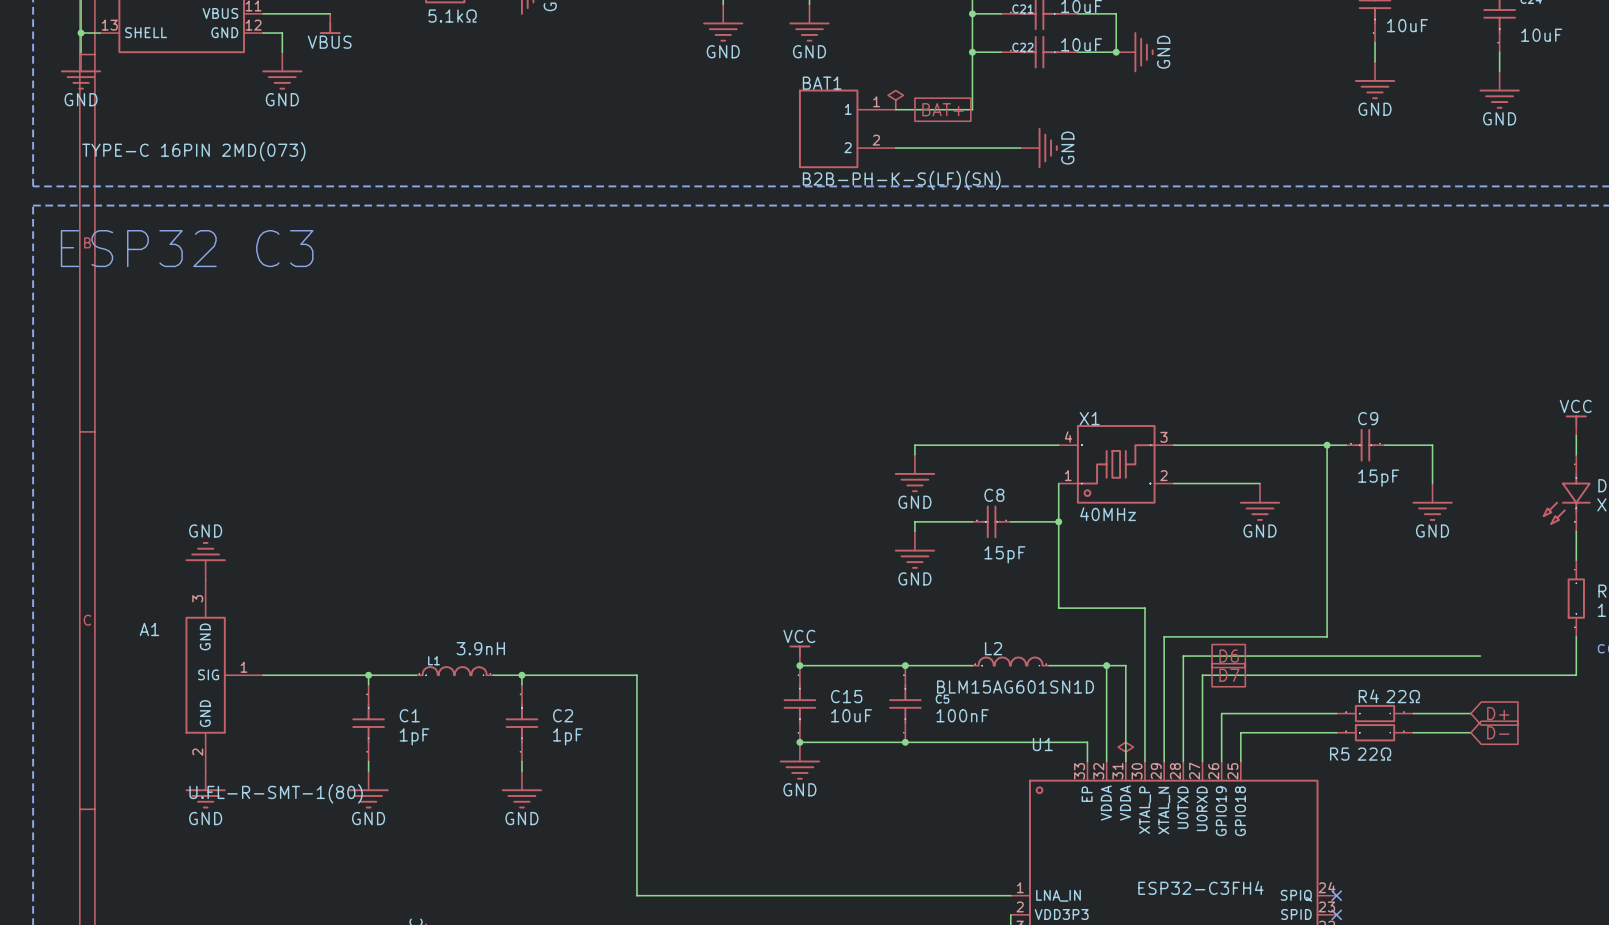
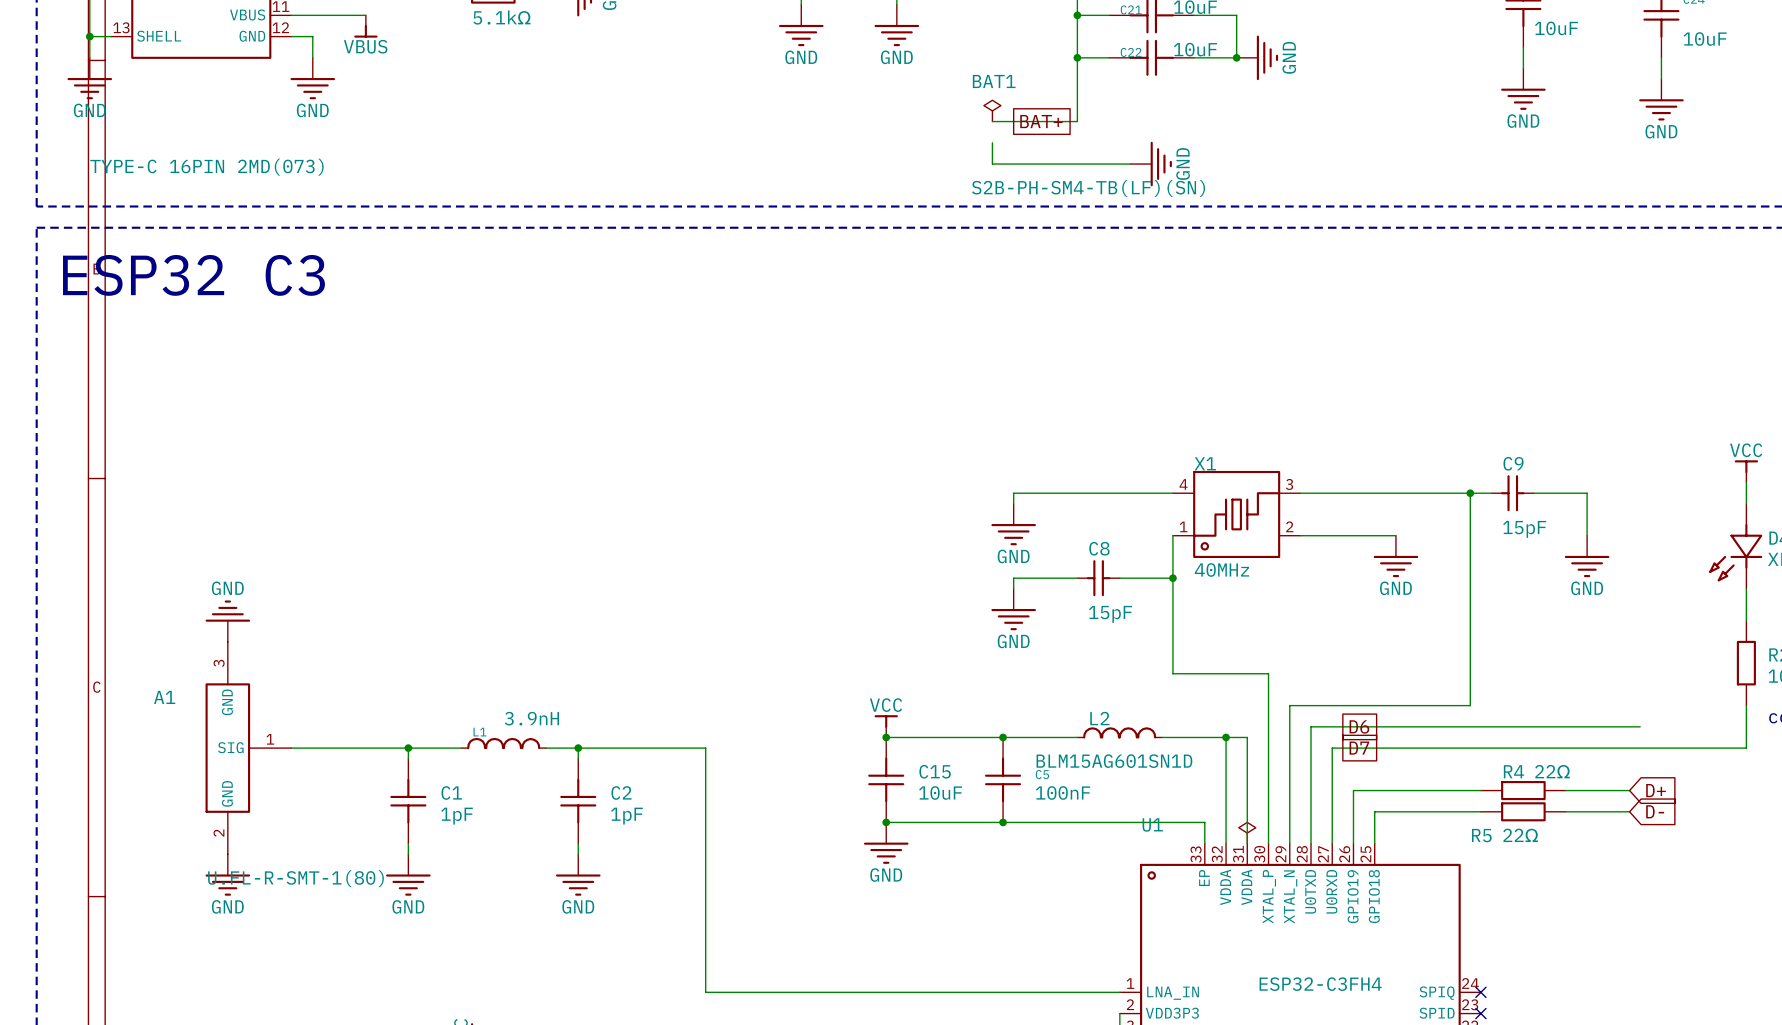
BAT1 name position: BAT1 (822, 83) -> BAT1 (994, 81)
BAT1 symbol: [798, 89, 896, 169] -> [972, 74, 1206, 197]
wire: none -> (992, 142) (992, 164)
BAT1 value: B2B-PH-K-S(LF)(SN) (901, 180) -> S2B-PH-SM4-TB(LF)(SN) (1088, 188)

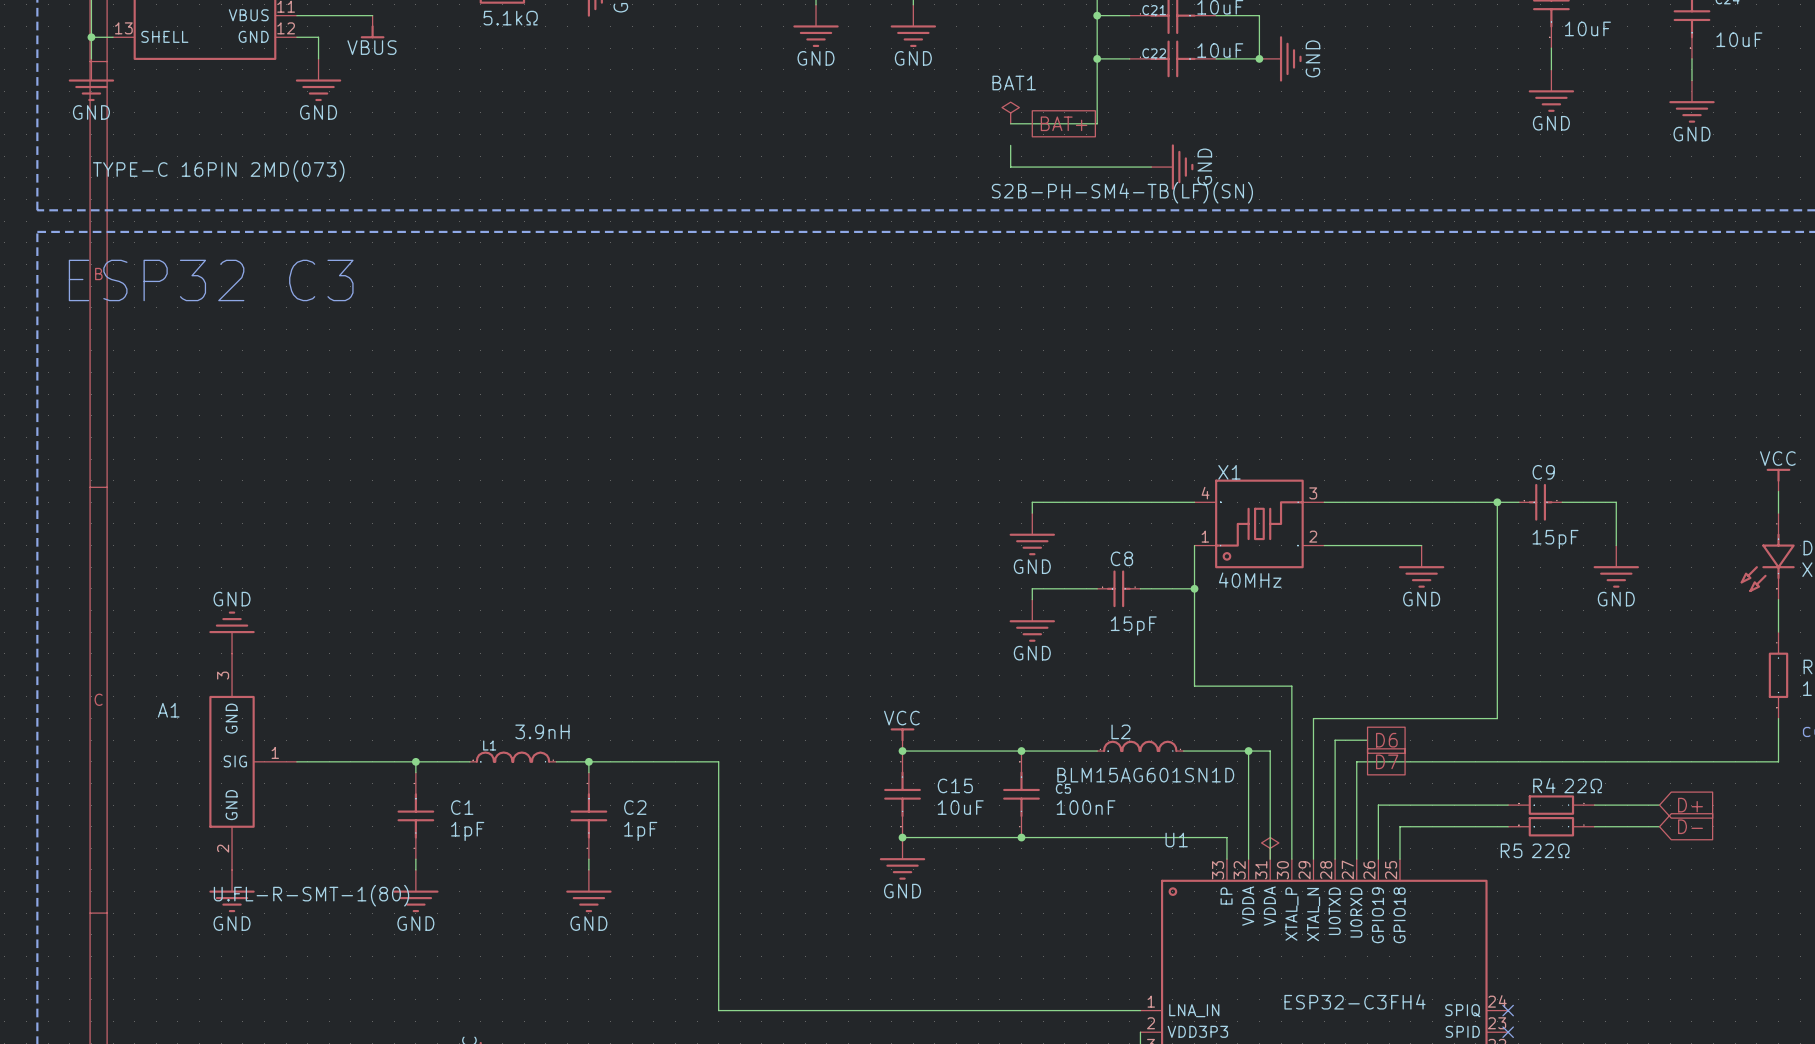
wire: (1342, 726) (1640, 726) -> none

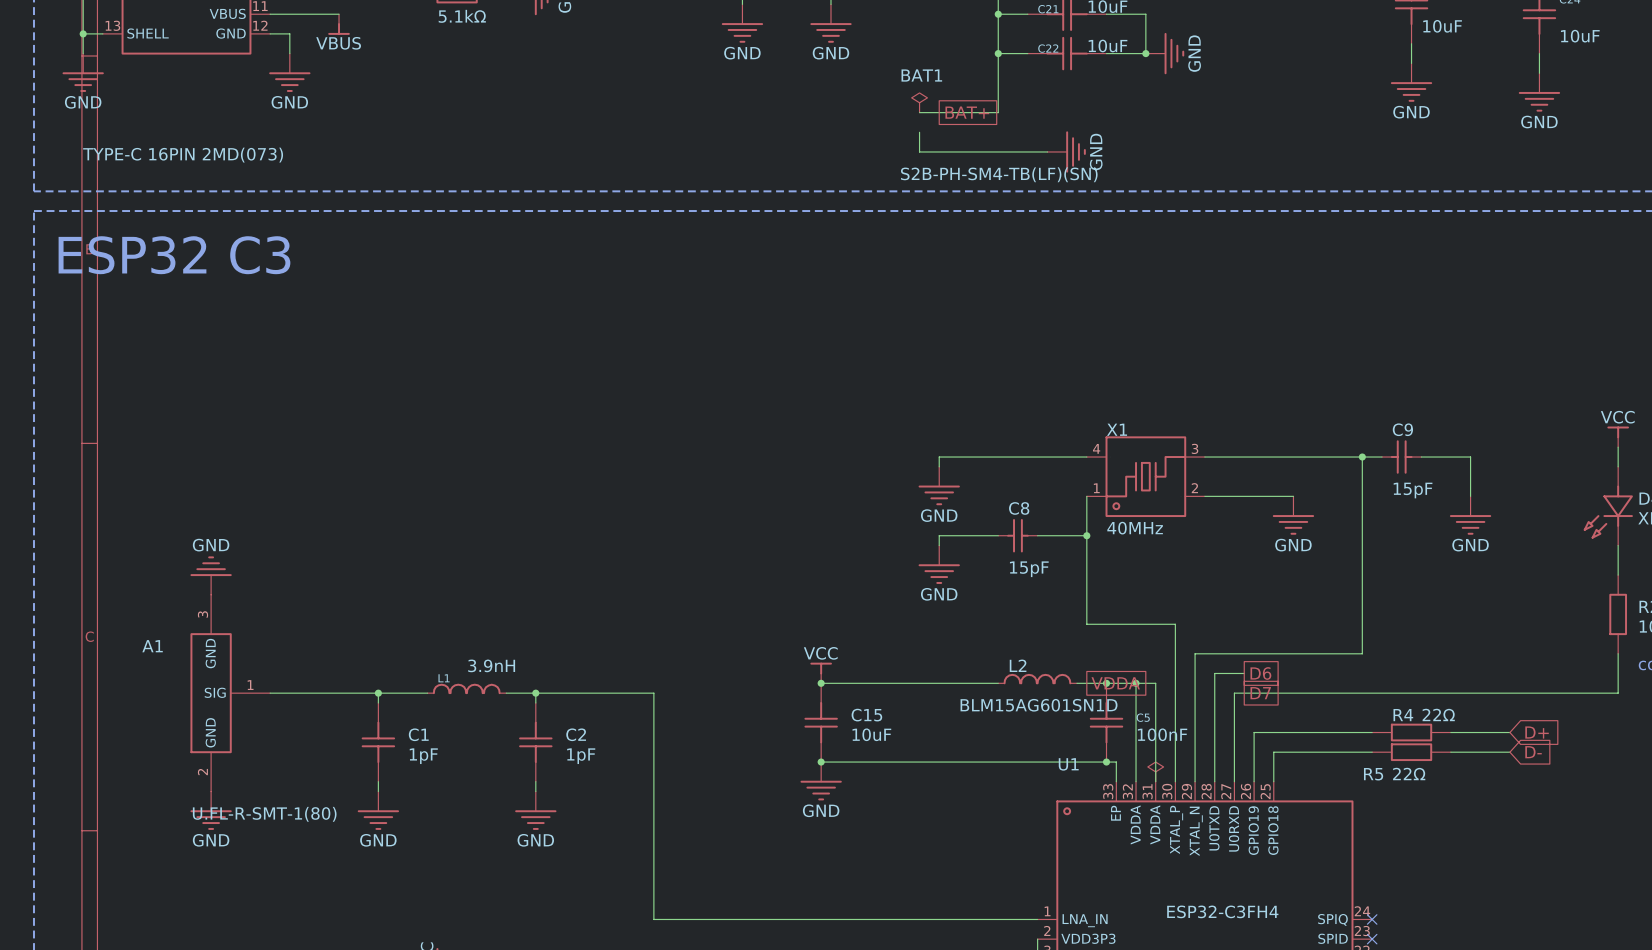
junction: (1021, 751) -> none
junction: none -> (1106, 683)
global label: none -> VDDA (1115, 683)
C5 position: (1021, 794) -> (1106, 722)
junction: (1021, 837) -> none
junction: none -> (1106, 762)

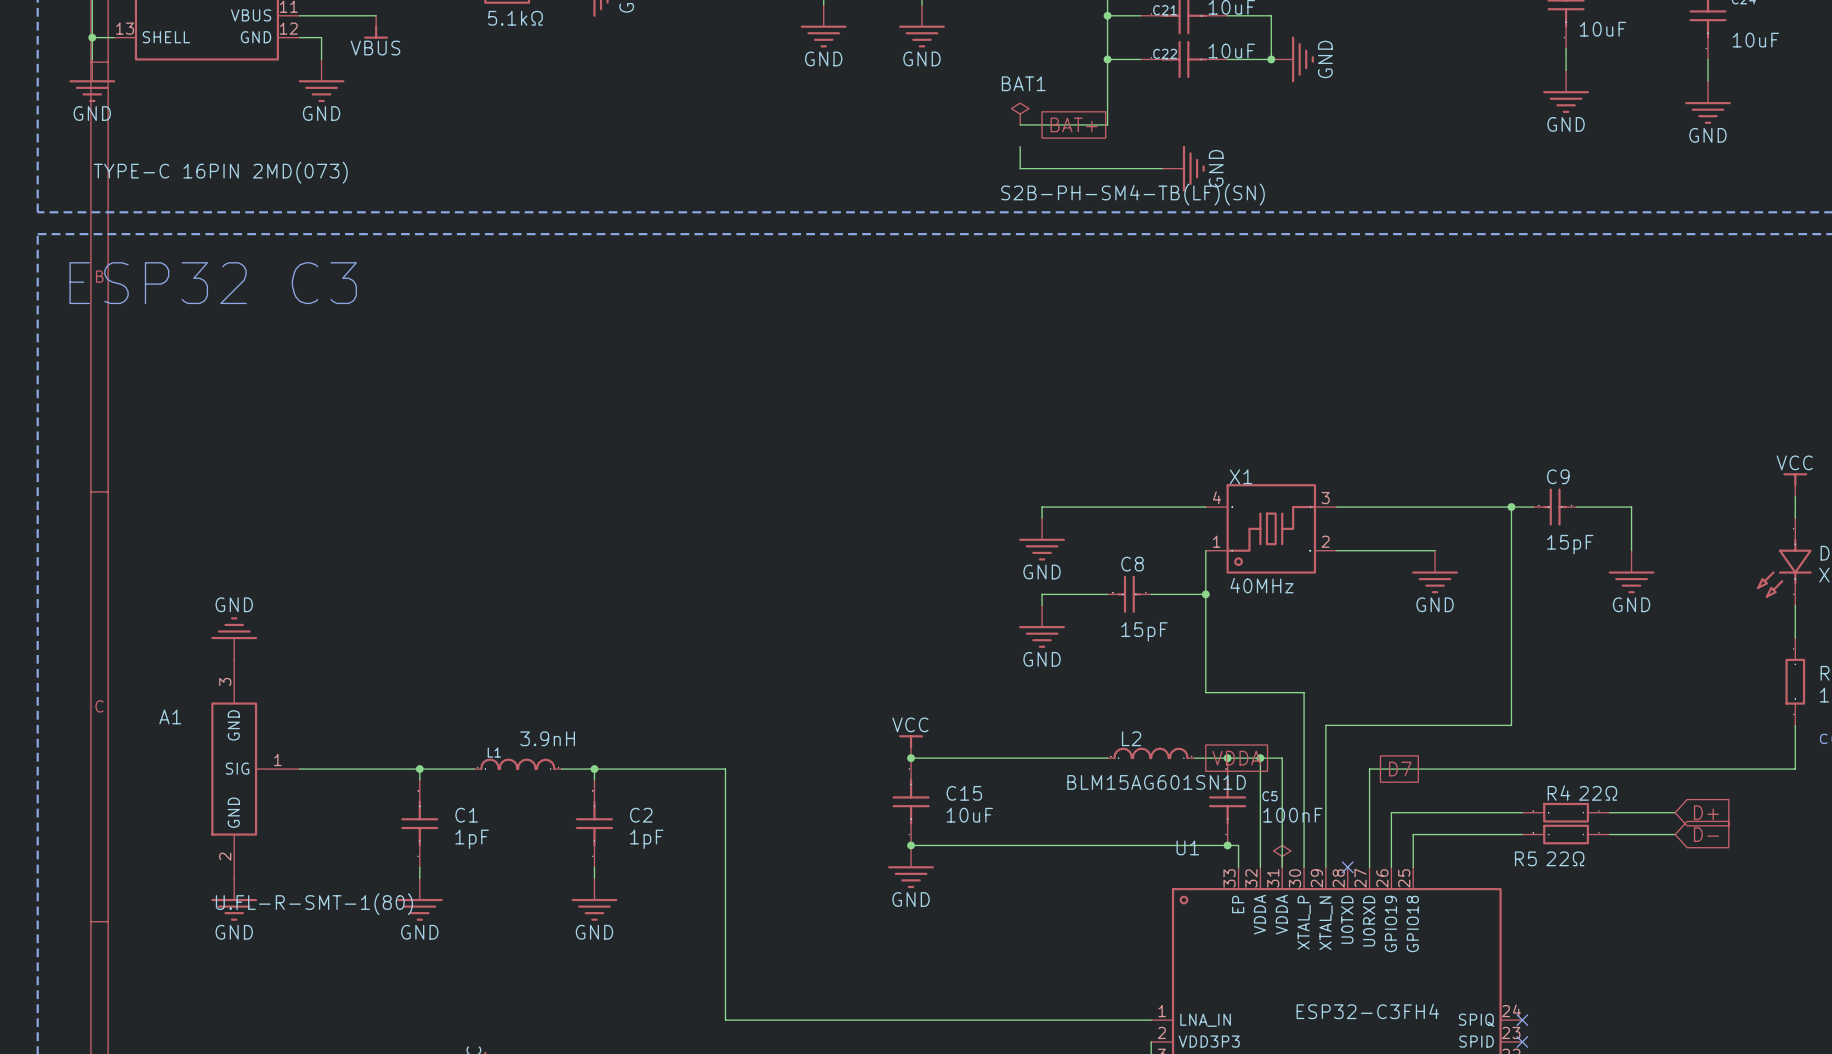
wire: (1244, 673) (1214, 673) (1214, 781) -> none
global label: D6 (1260, 673) -> none
no-connect mark: none -> (1347, 867)

